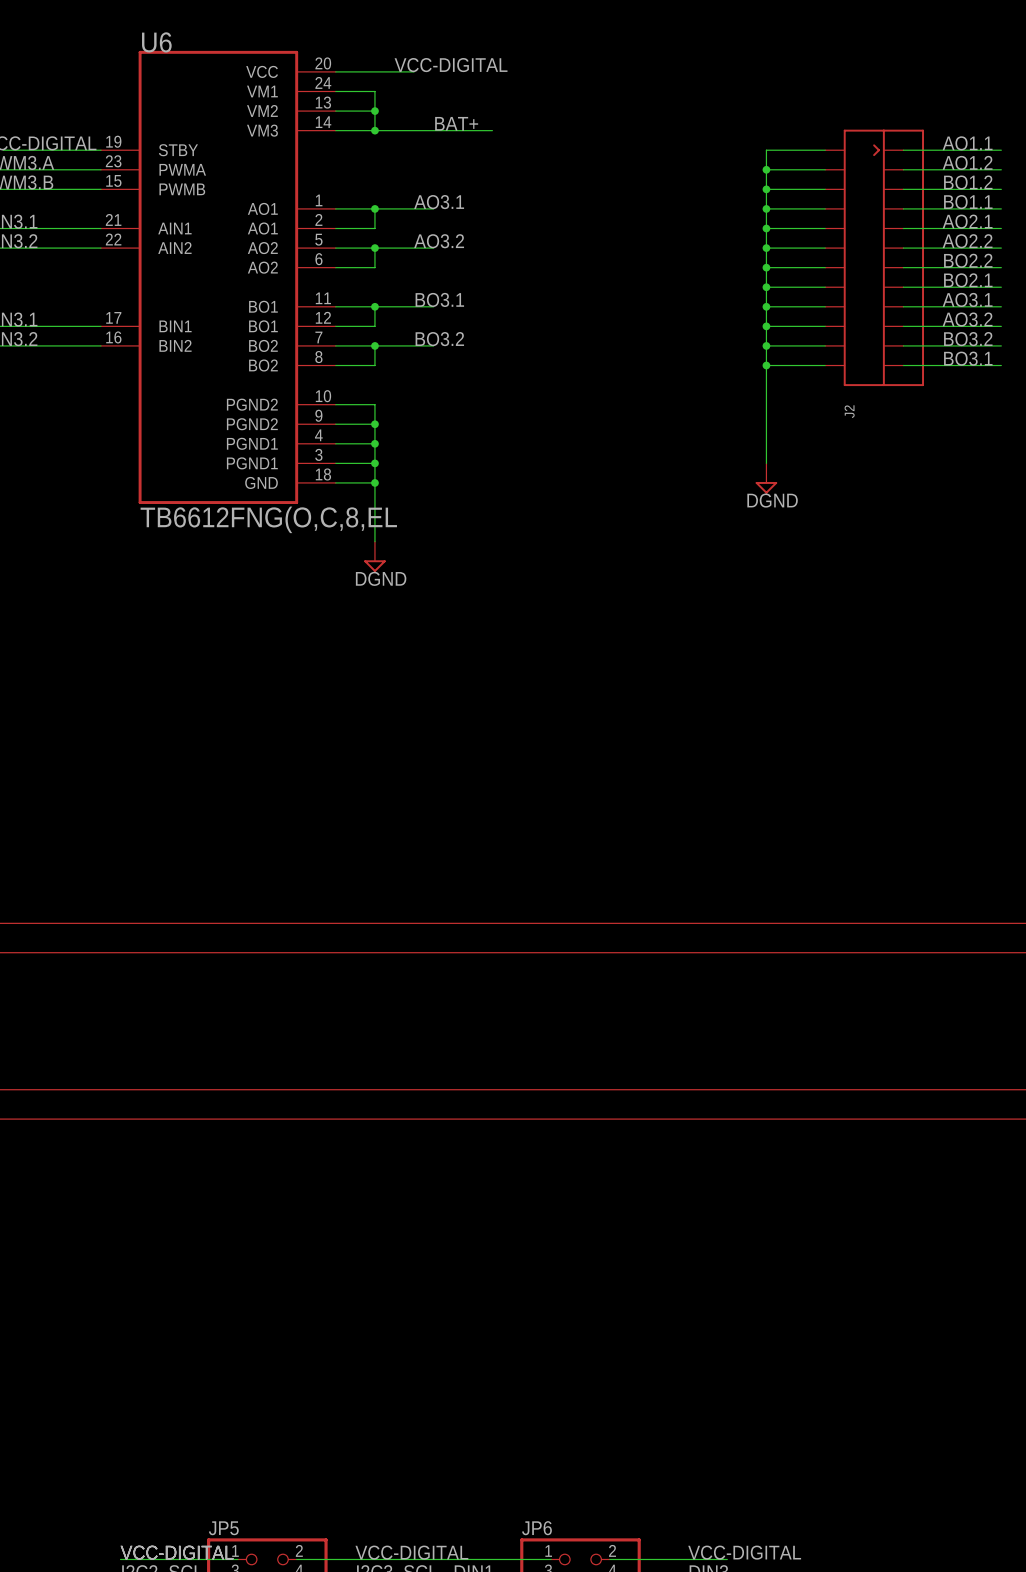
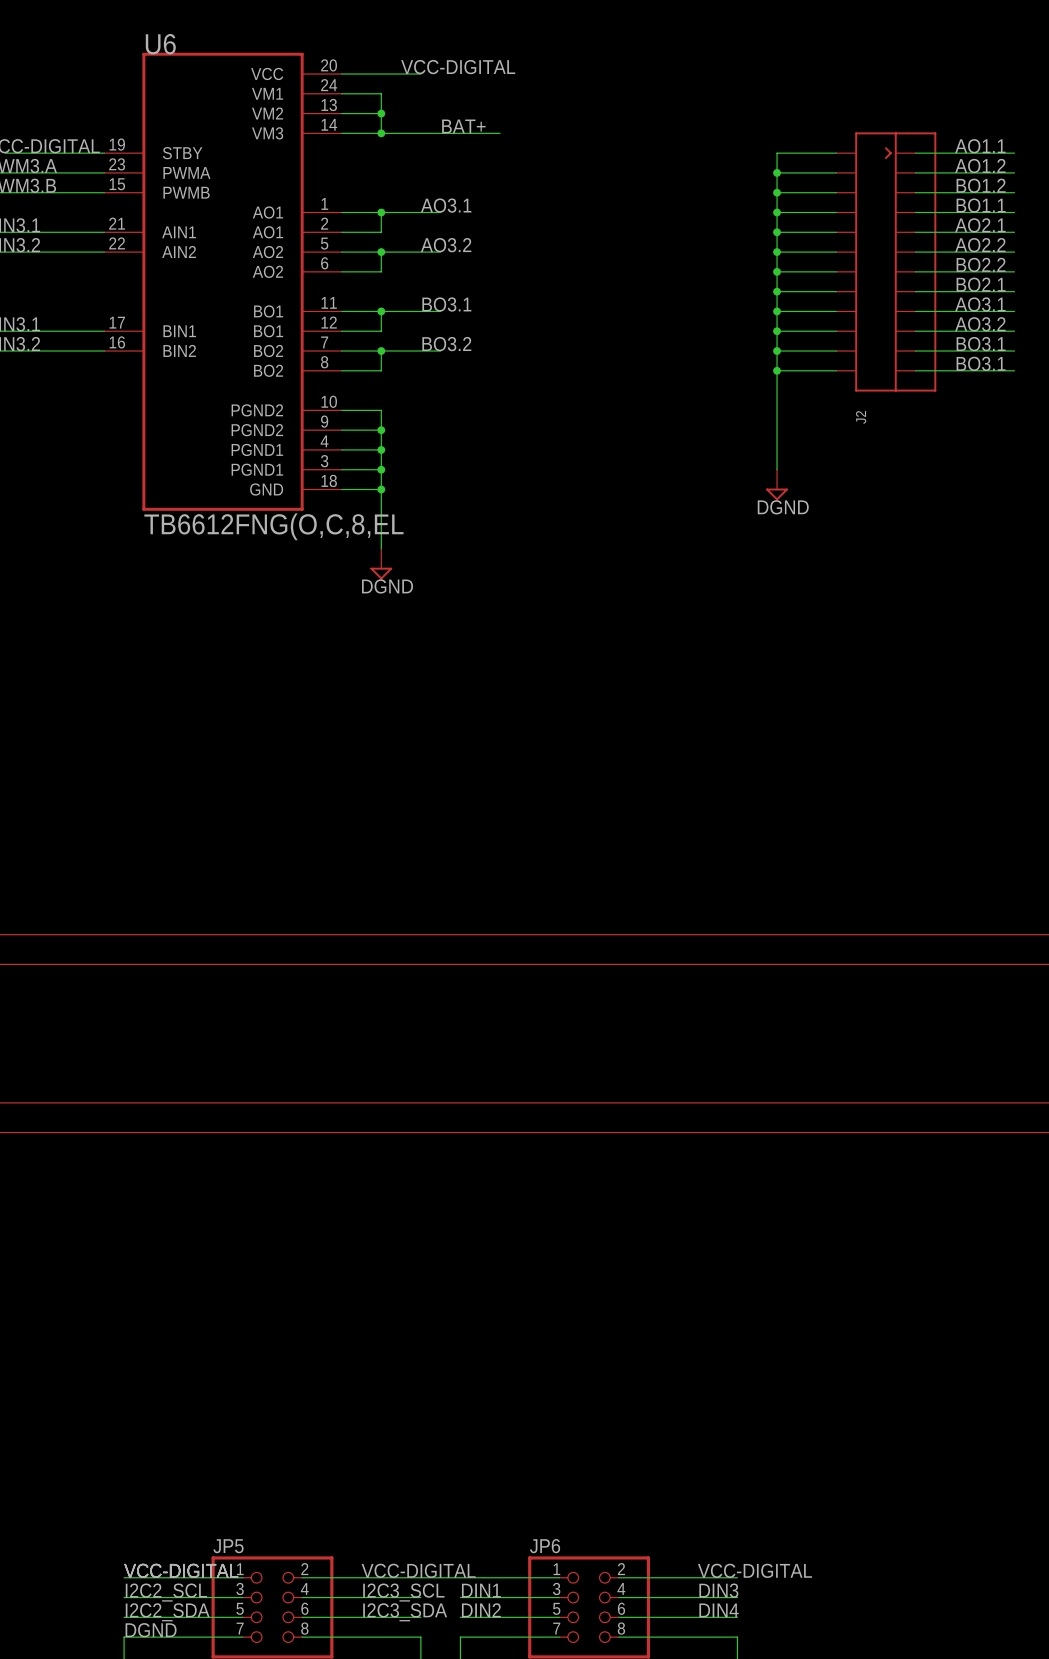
label: BO3.2 (968, 339) -> BO3.1 (981, 344)

